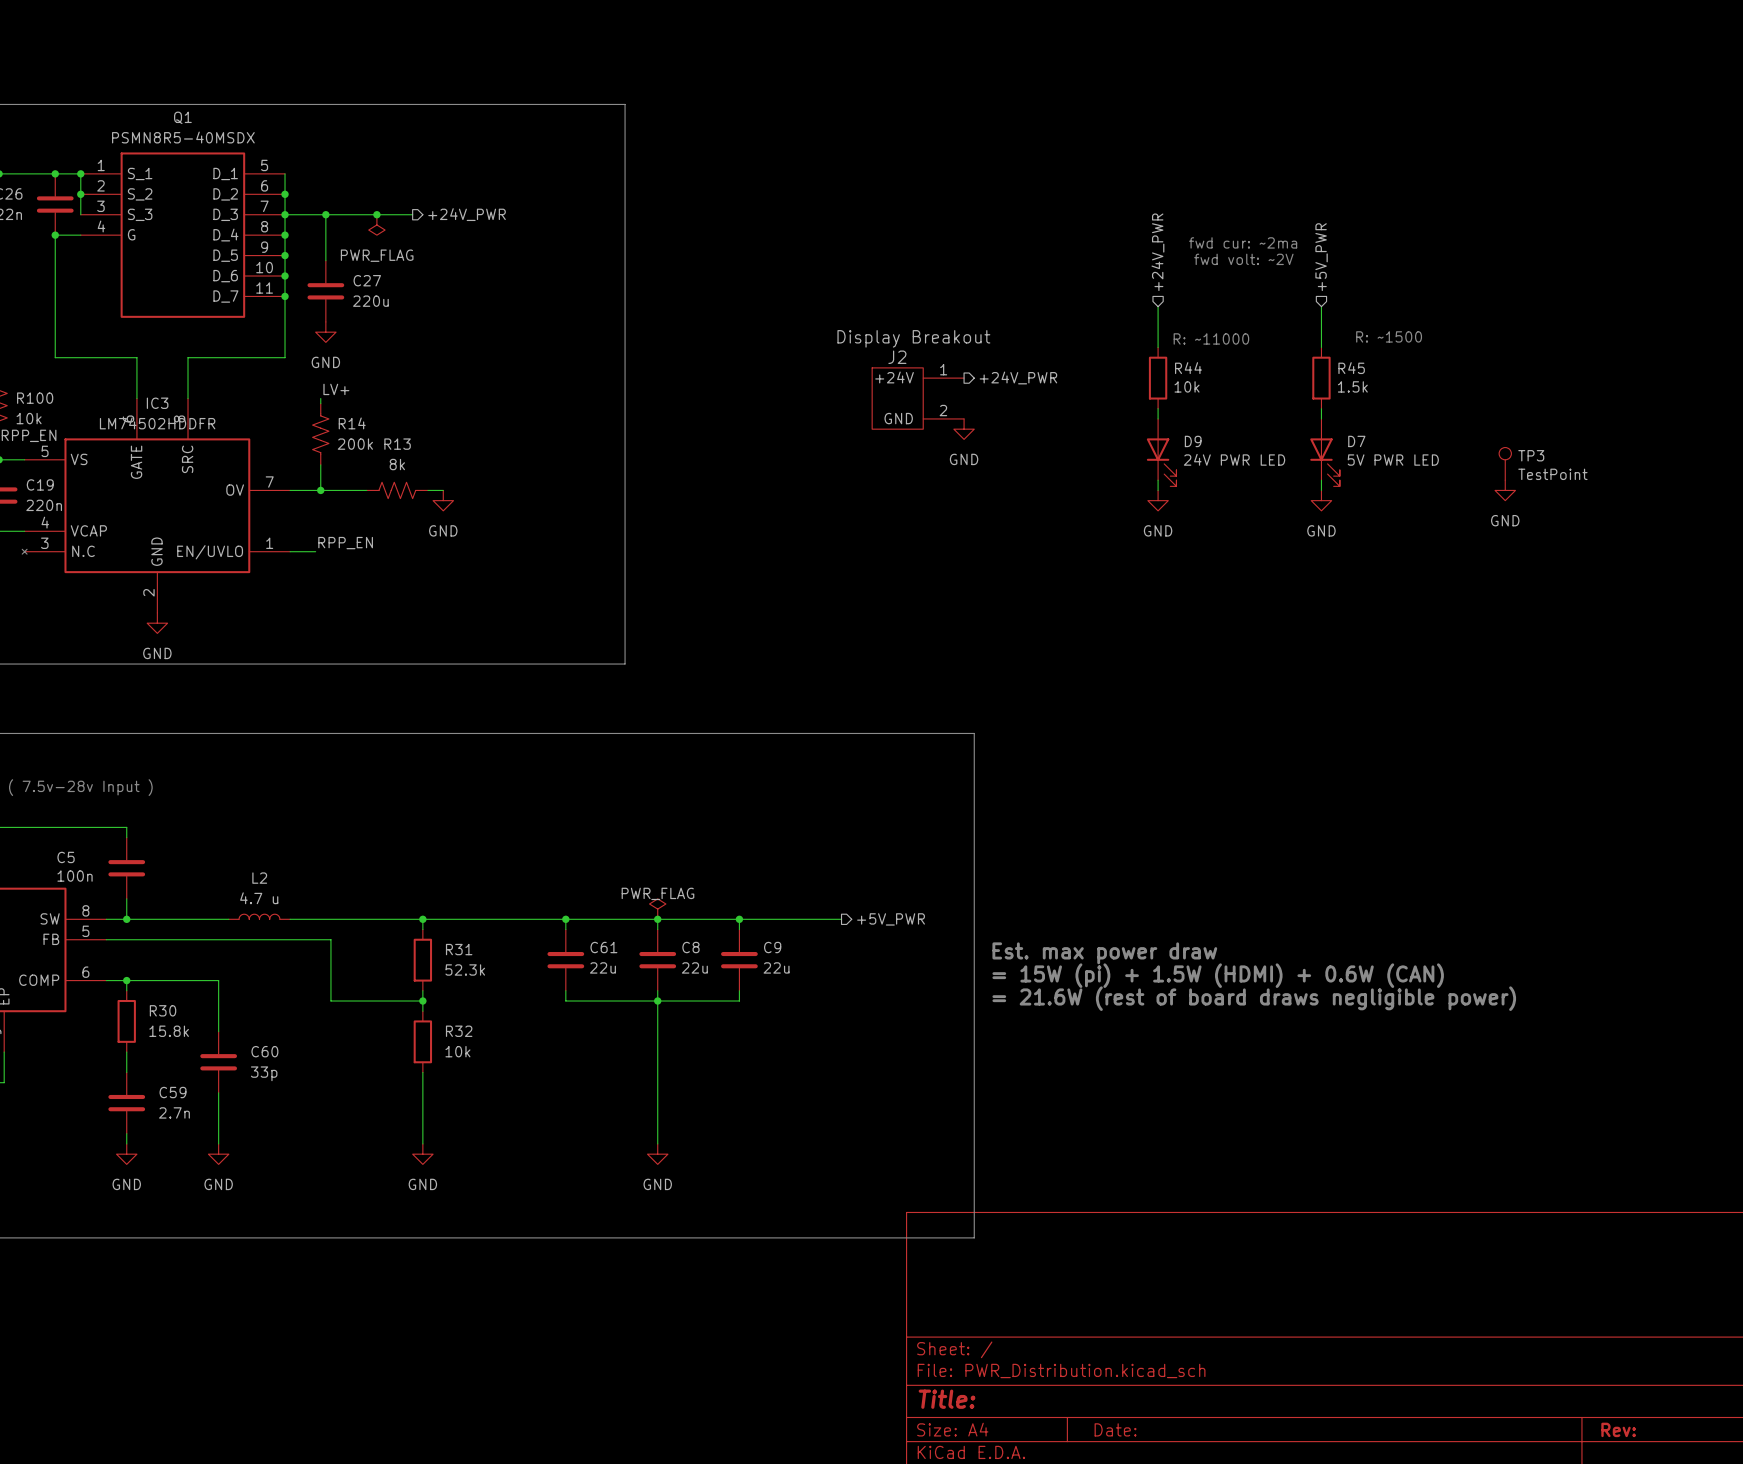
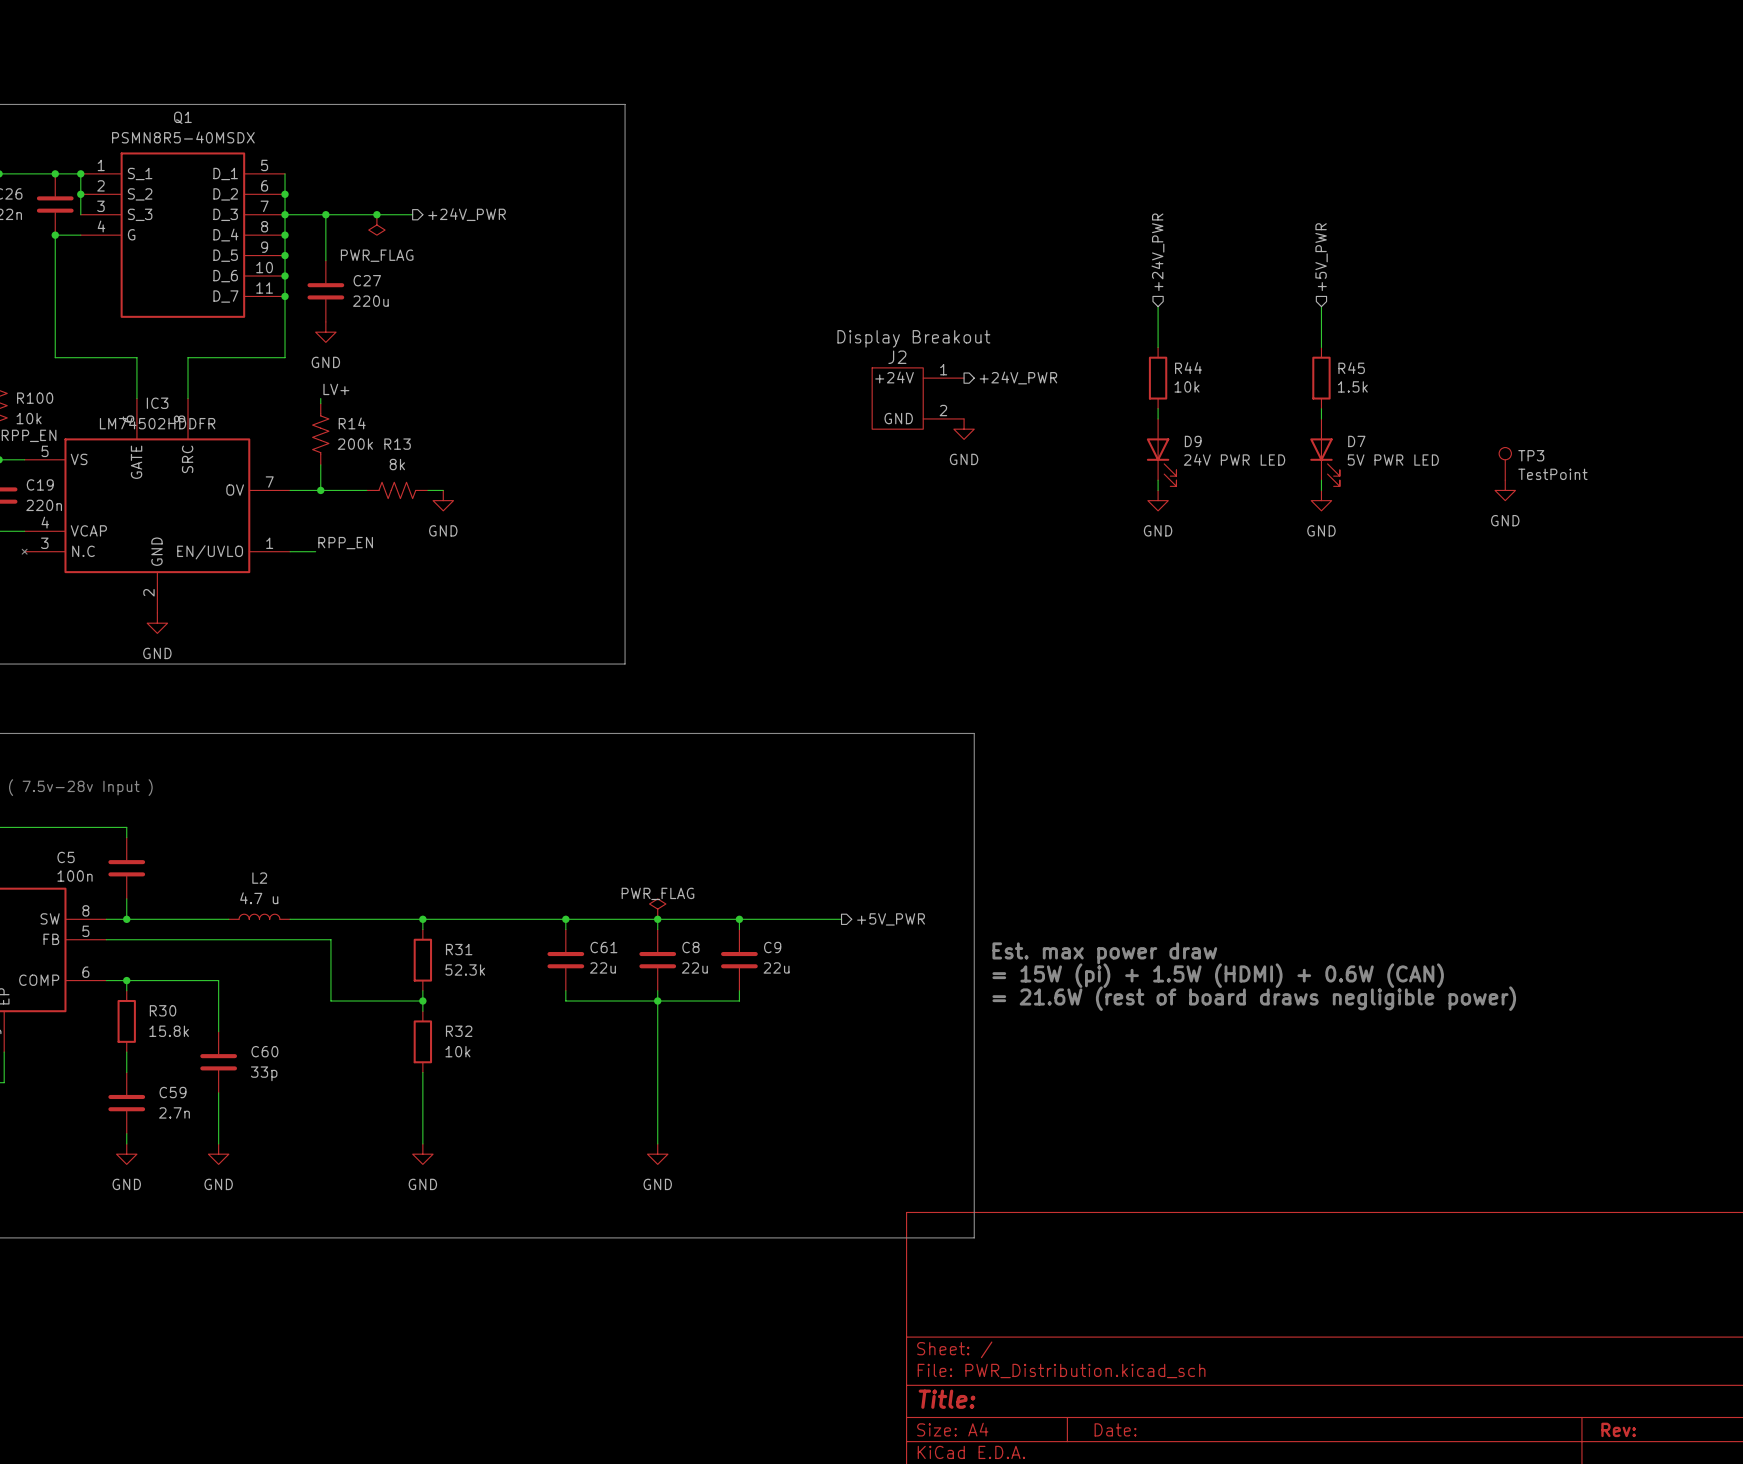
text: fwd cur: ~2ma (1243, 242) -> none
text: fwd volt: ~2V (1243, 259) -> none
text: R: ~1500 (1389, 336) -> none
text: R: ~11000 (1211, 338) -> none

